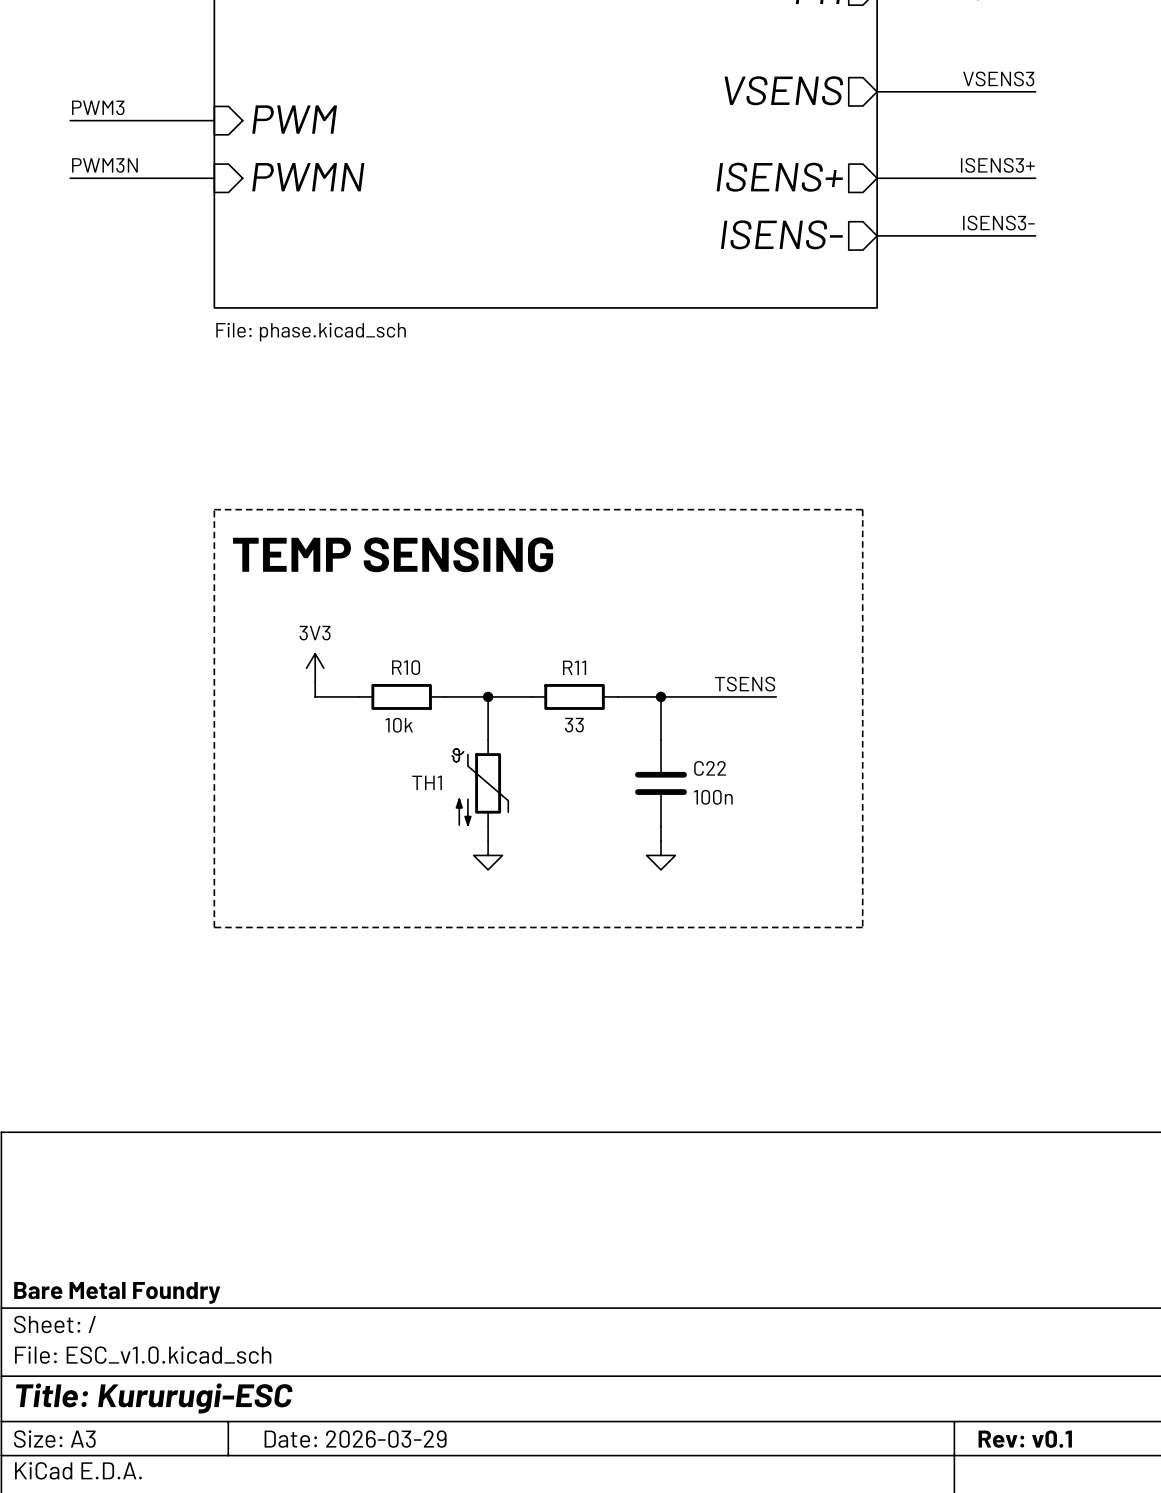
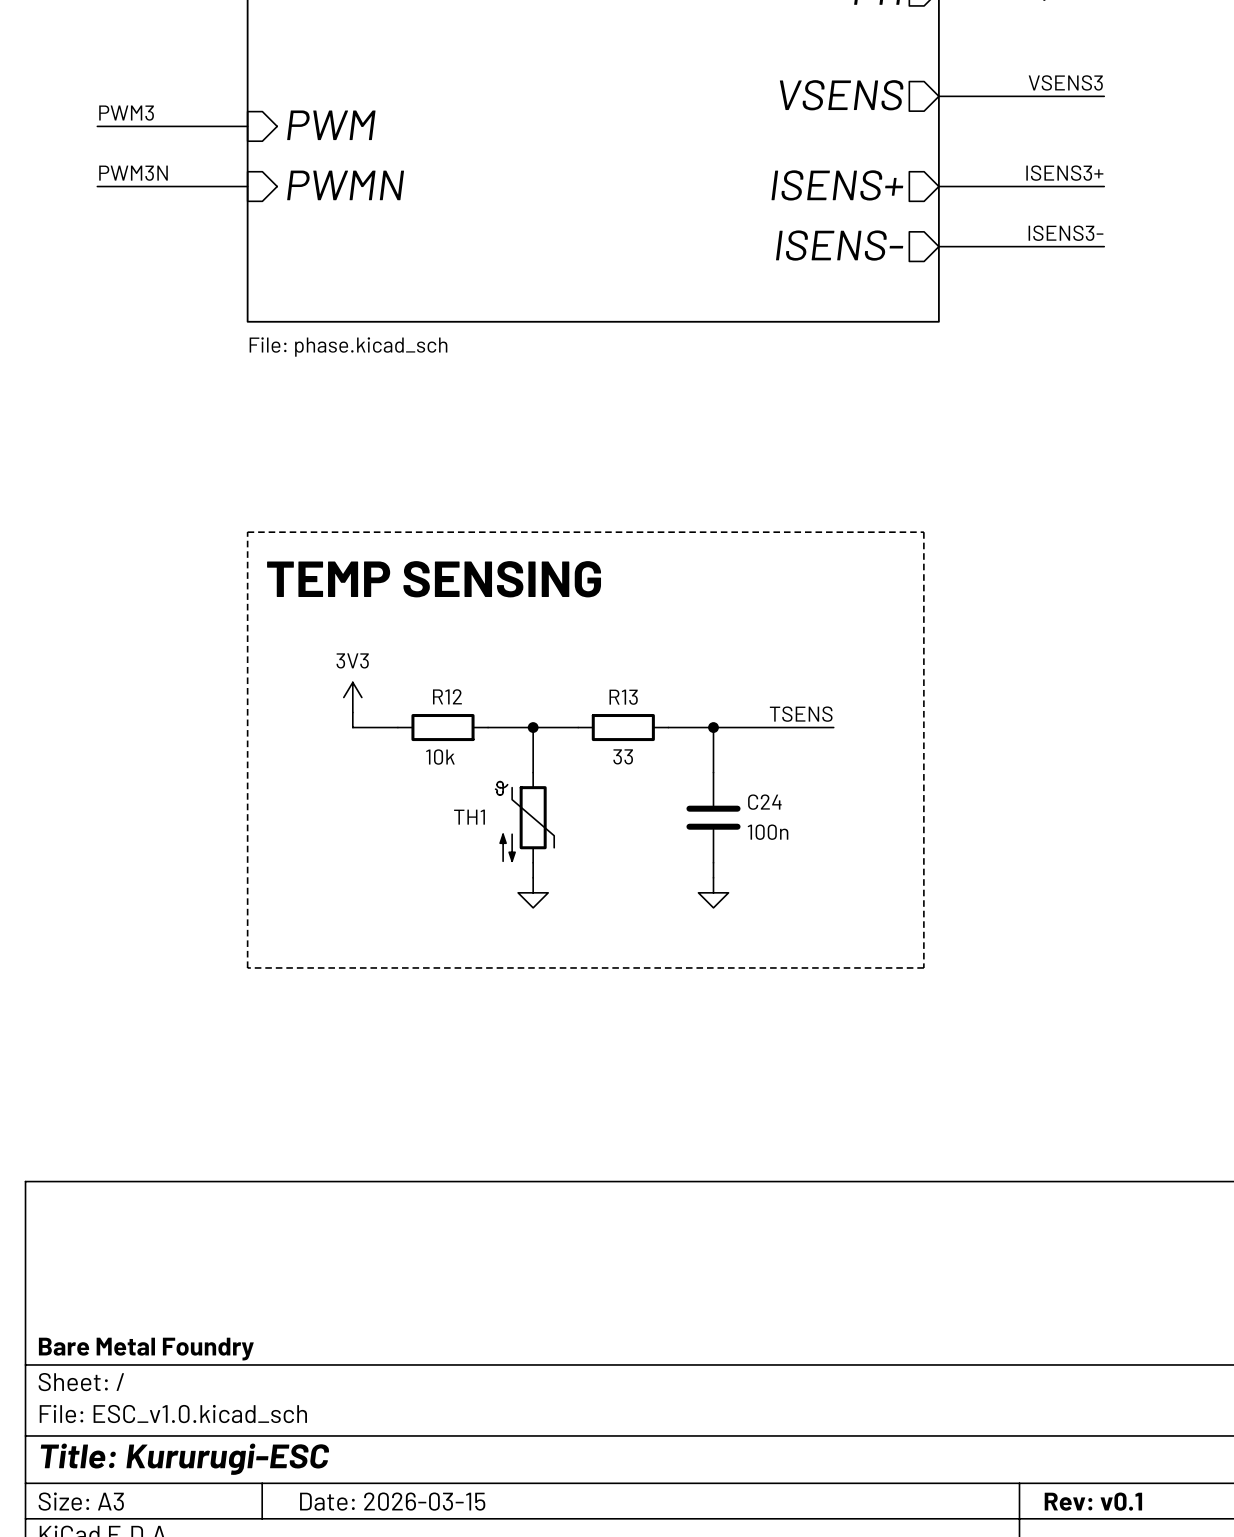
R10 name: R10 (406, 667) -> R12 (447, 696)
R11 name: R11 (574, 667) -> R13 (623, 697)
C22 name: C22 (710, 768) -> C24 (764, 802)
title block: Date: 2026-03-29 (355, 1439) -> Date: 2026-03-15 (392, 1501)

